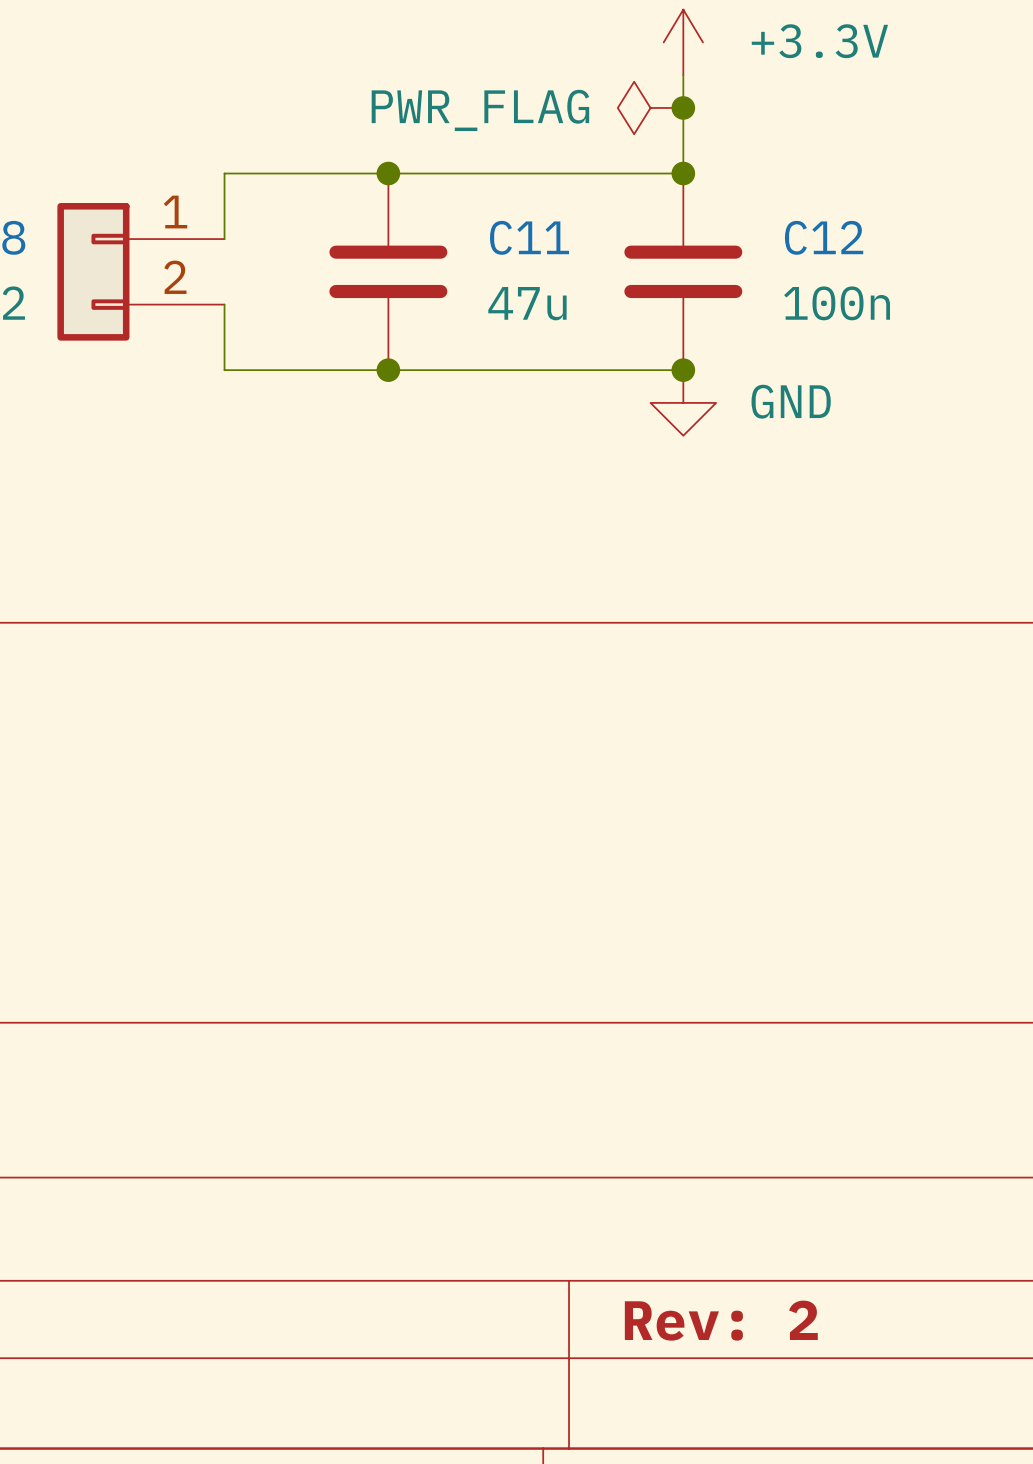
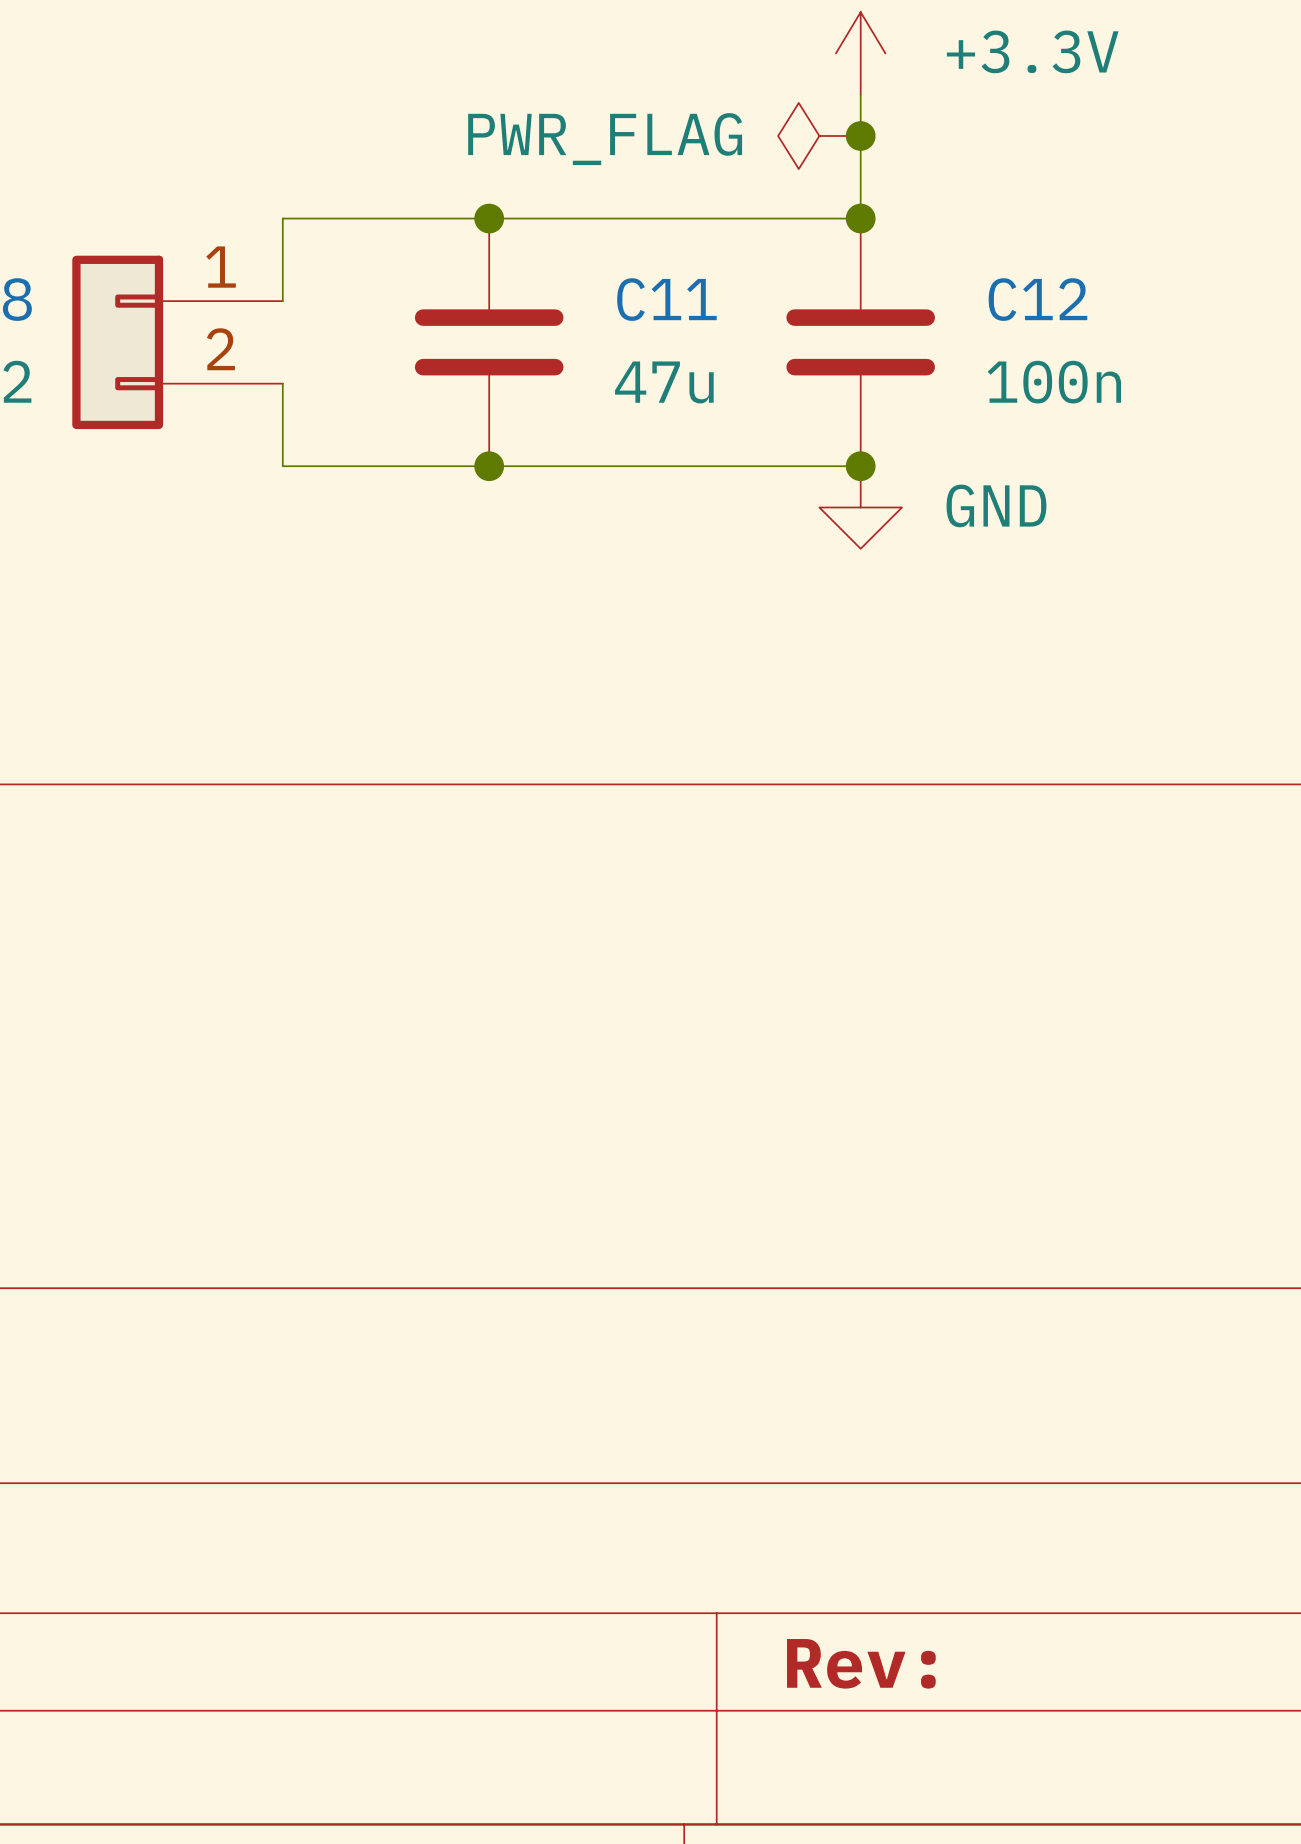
title block: Rev: 2 (721, 1320) -> Rev: (861, 1663)

